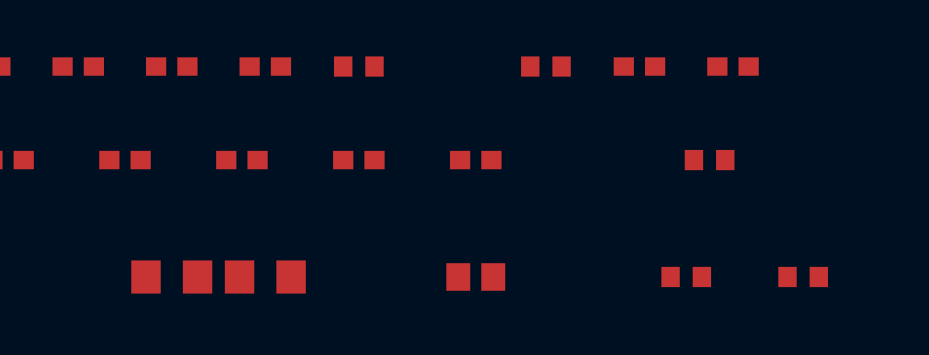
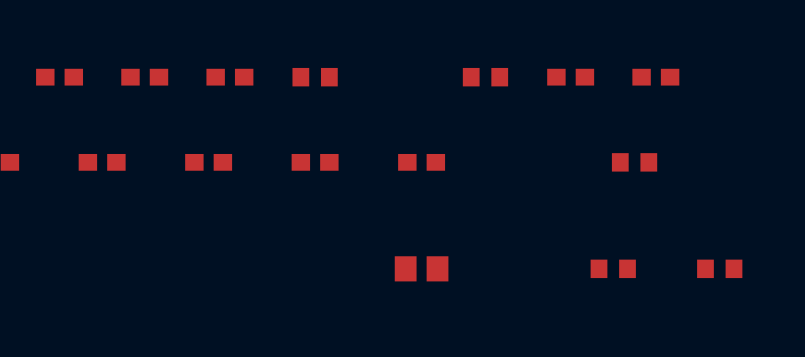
part: (171, 276) -> none
part: (265, 276) -> none

